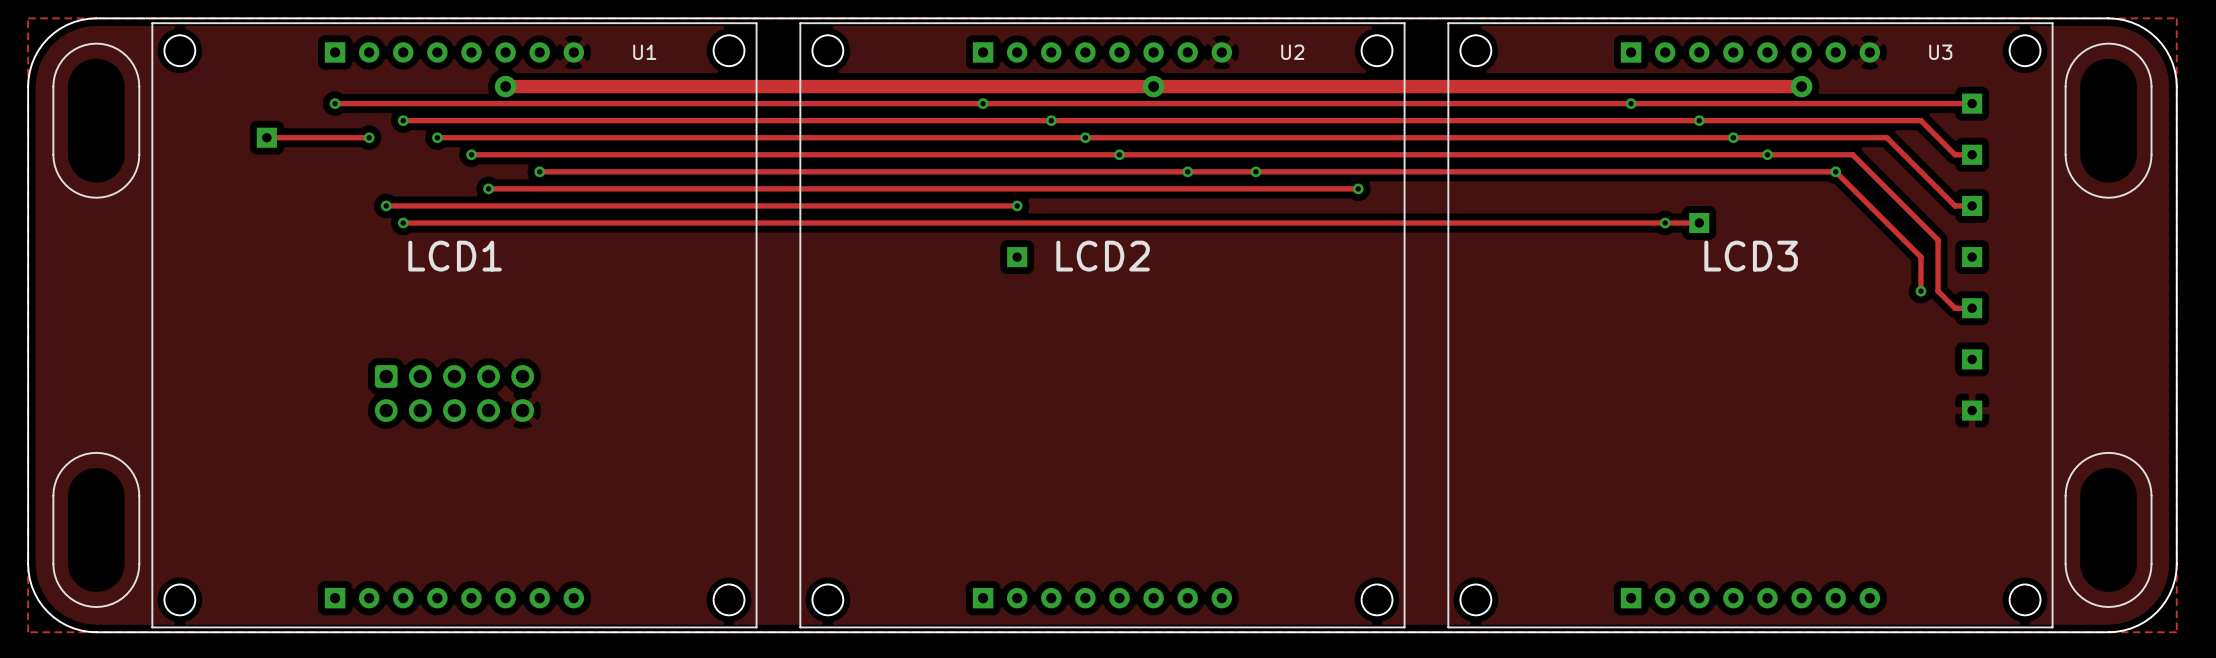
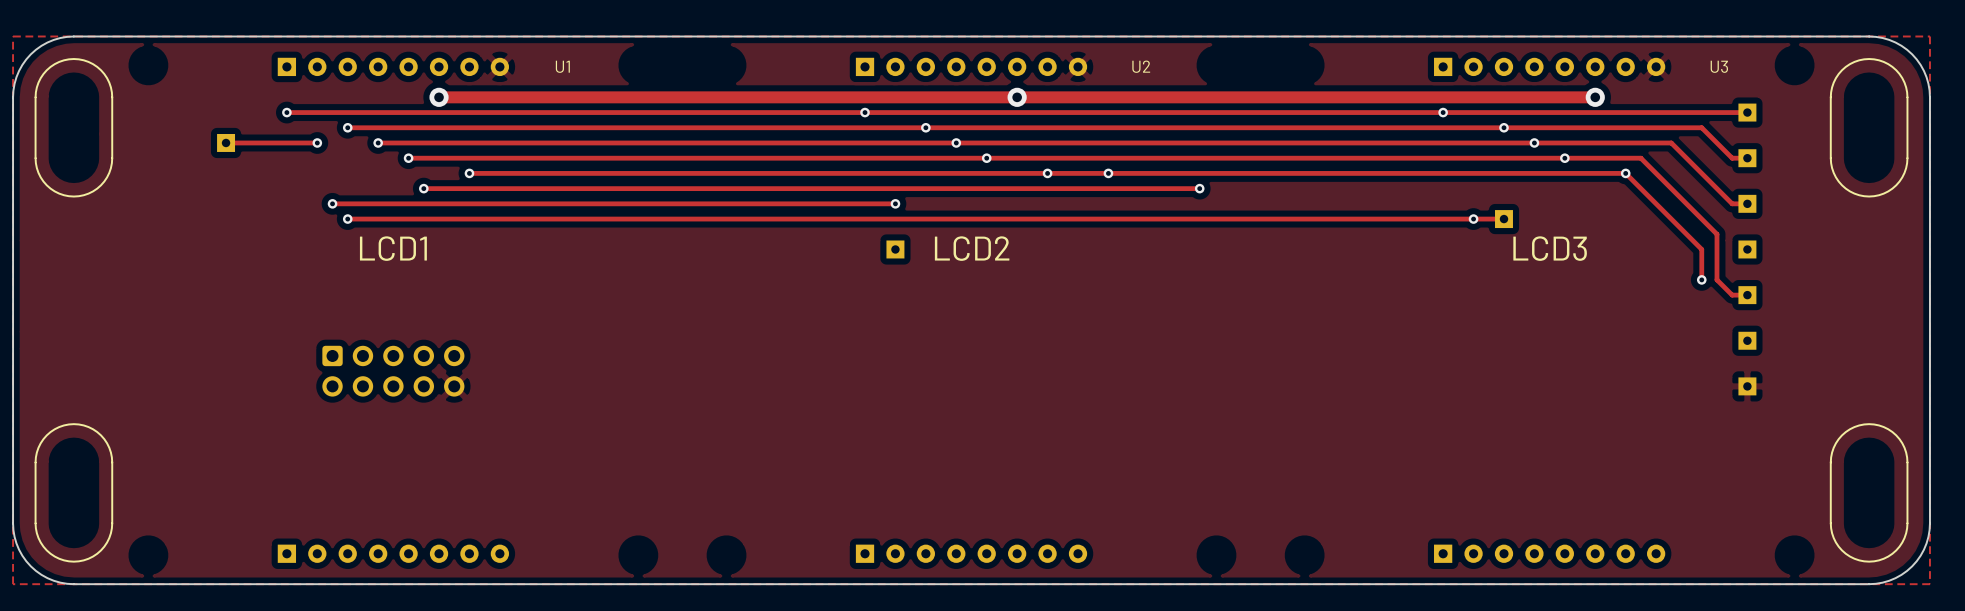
U1 footprint: [151, 22, 758, 629] -> [277, 57, 510, 563]
U2 footprint: [799, 22, 1406, 629] -> [855, 57, 1088, 563]
U3 footprint: [1447, 22, 2054, 629] -> [1434, 57, 1666, 563]

